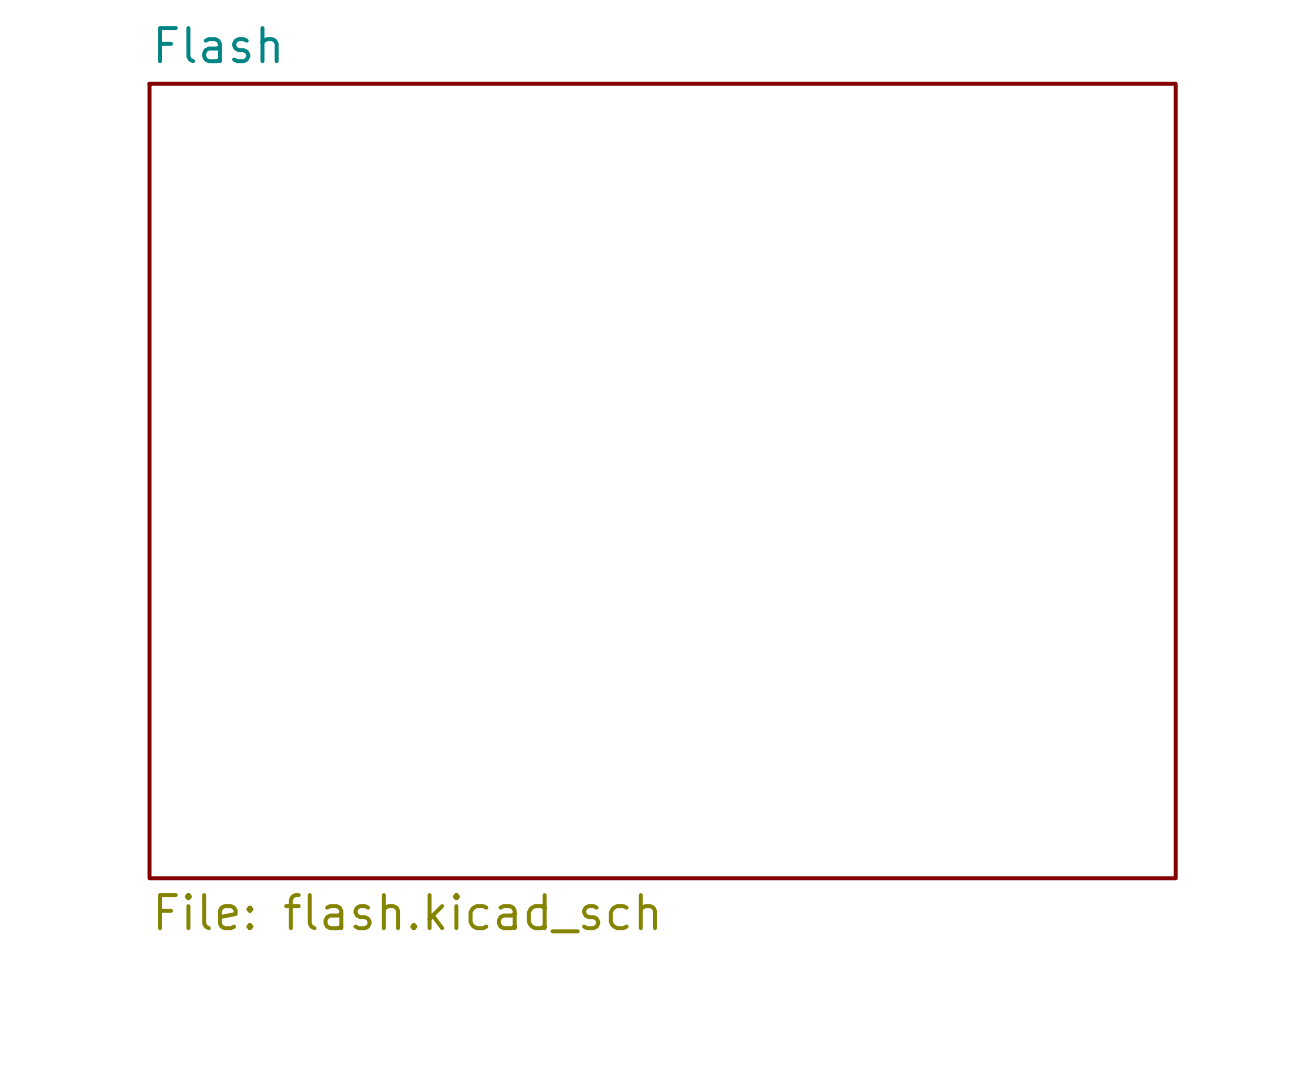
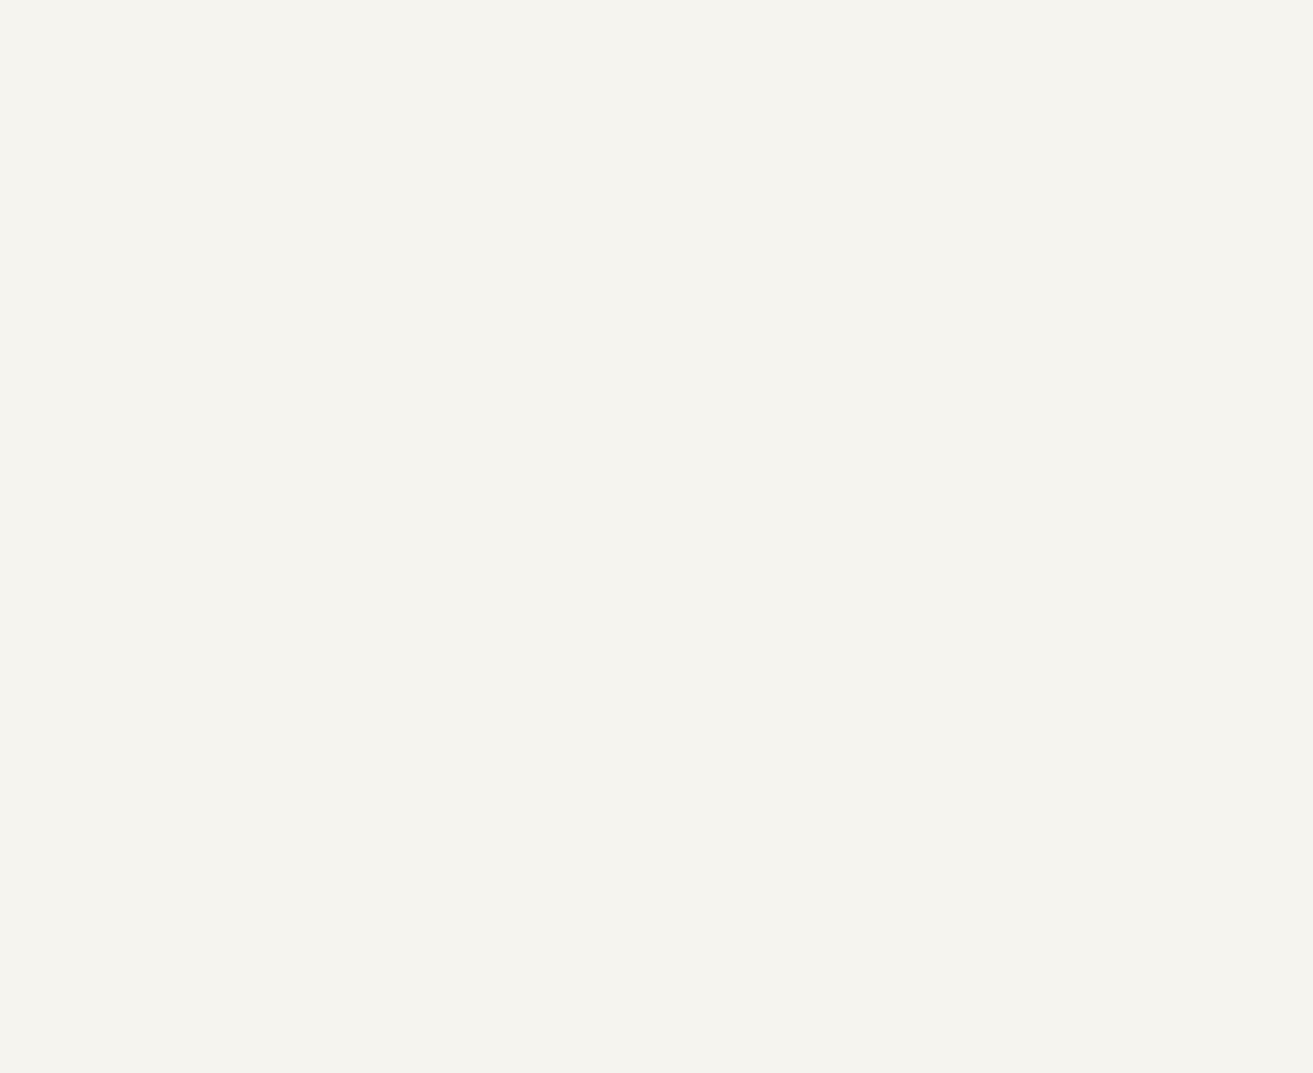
sheet Flash: File: flash.kicad_sch (662, 481) -> none

